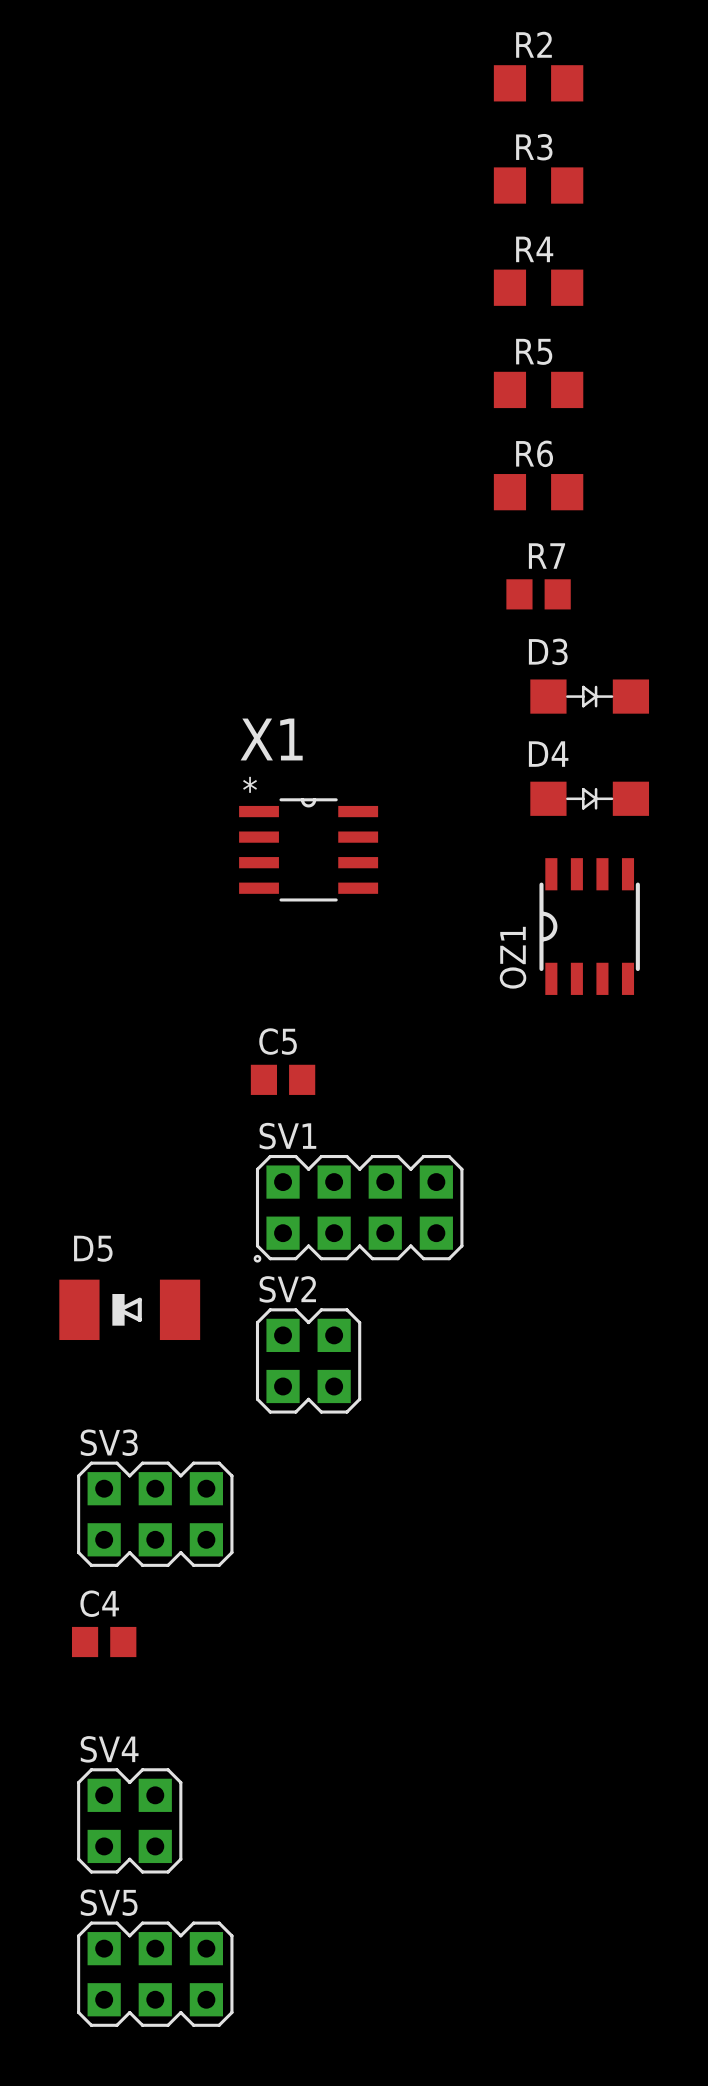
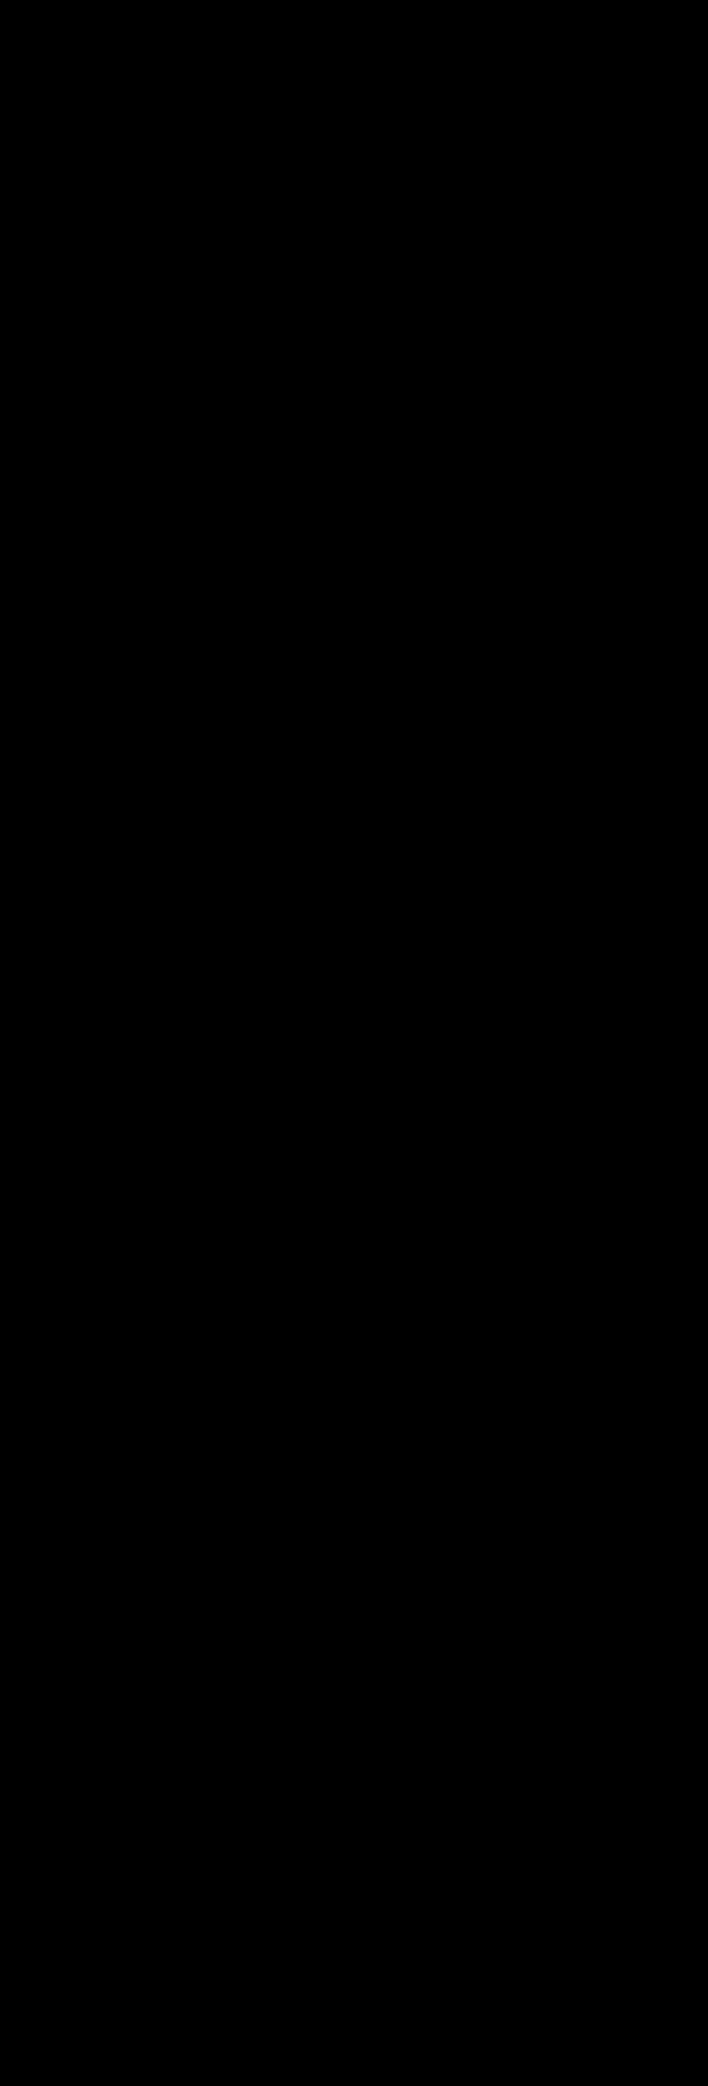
R2: (538, 83) -> none
R3: (538, 185) -> none
R4: (538, 287) -> none
R5: (538, 389) -> none
R6: (538, 492) -> none
R7: (538, 594) -> none
D3: (589, 696) -> none
D4: (589, 798) -> none
X1: (308, 849) -> none
OZ1: (589, 926) -> none
C5: (283, 1079) -> none
SV1: (358, 1208) -> none
D5: (129, 1309) -> none
SV2: (308, 1360) -> none
SV3: (155, 1514) -> none
C4: (104, 1642) -> none
SV4: (129, 1820) -> none
SV5: (155, 1974) -> none

